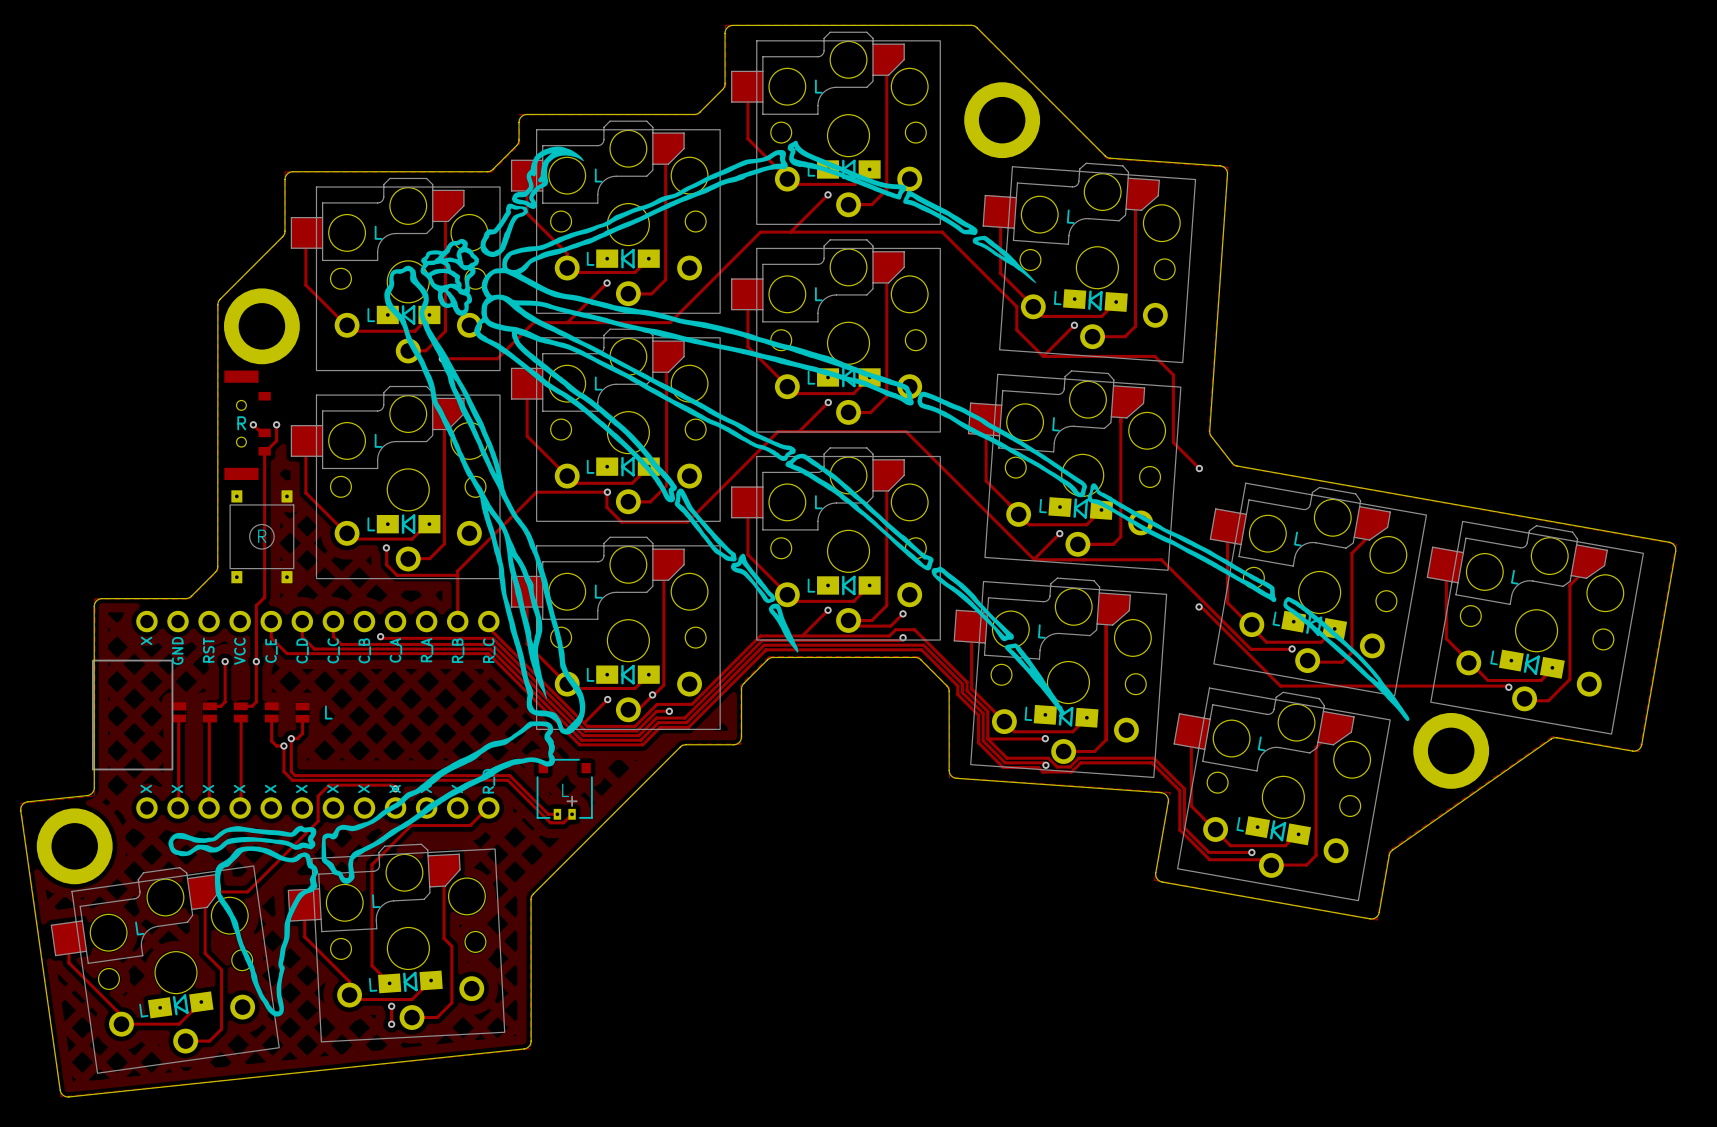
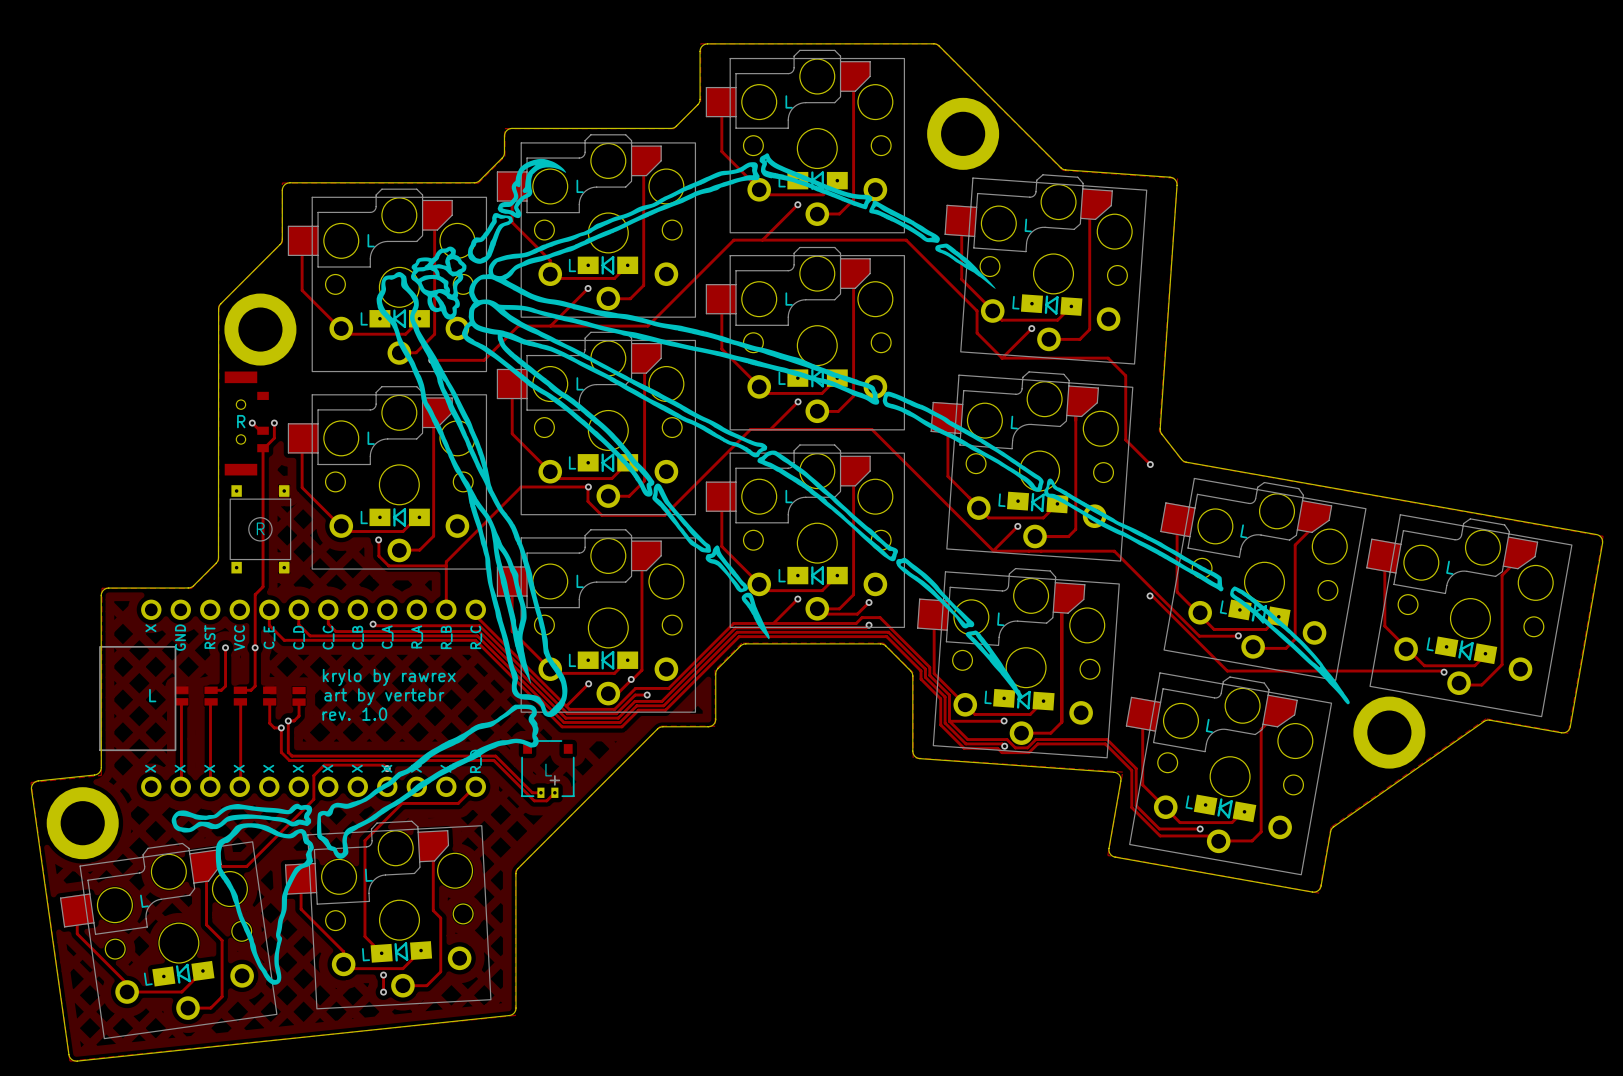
drawing: none -> [322, 668, 456, 721]
text position: L (328, 712) -> L (152, 695)

